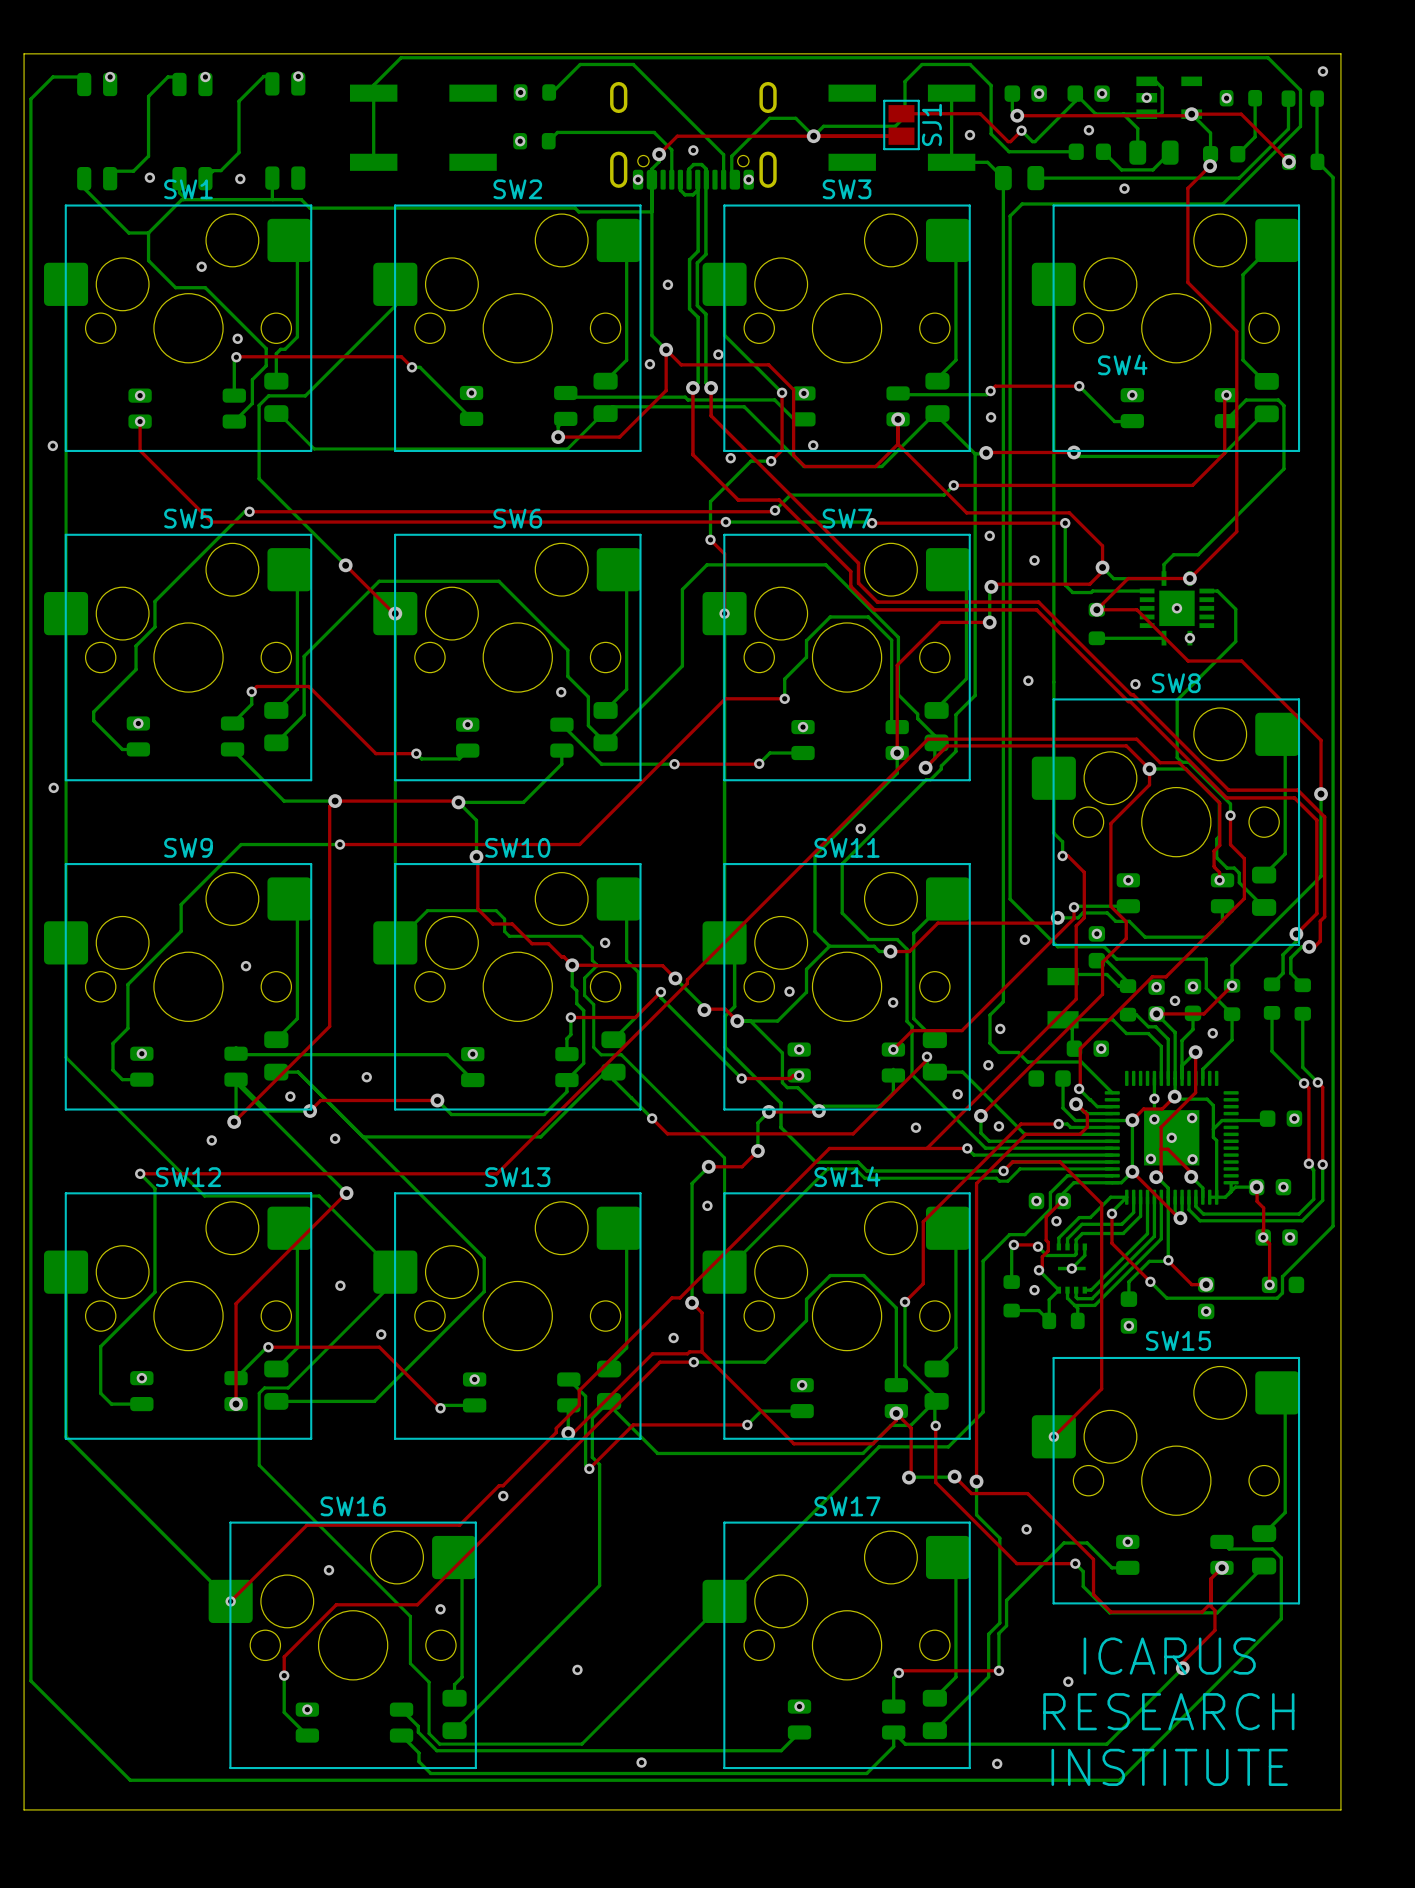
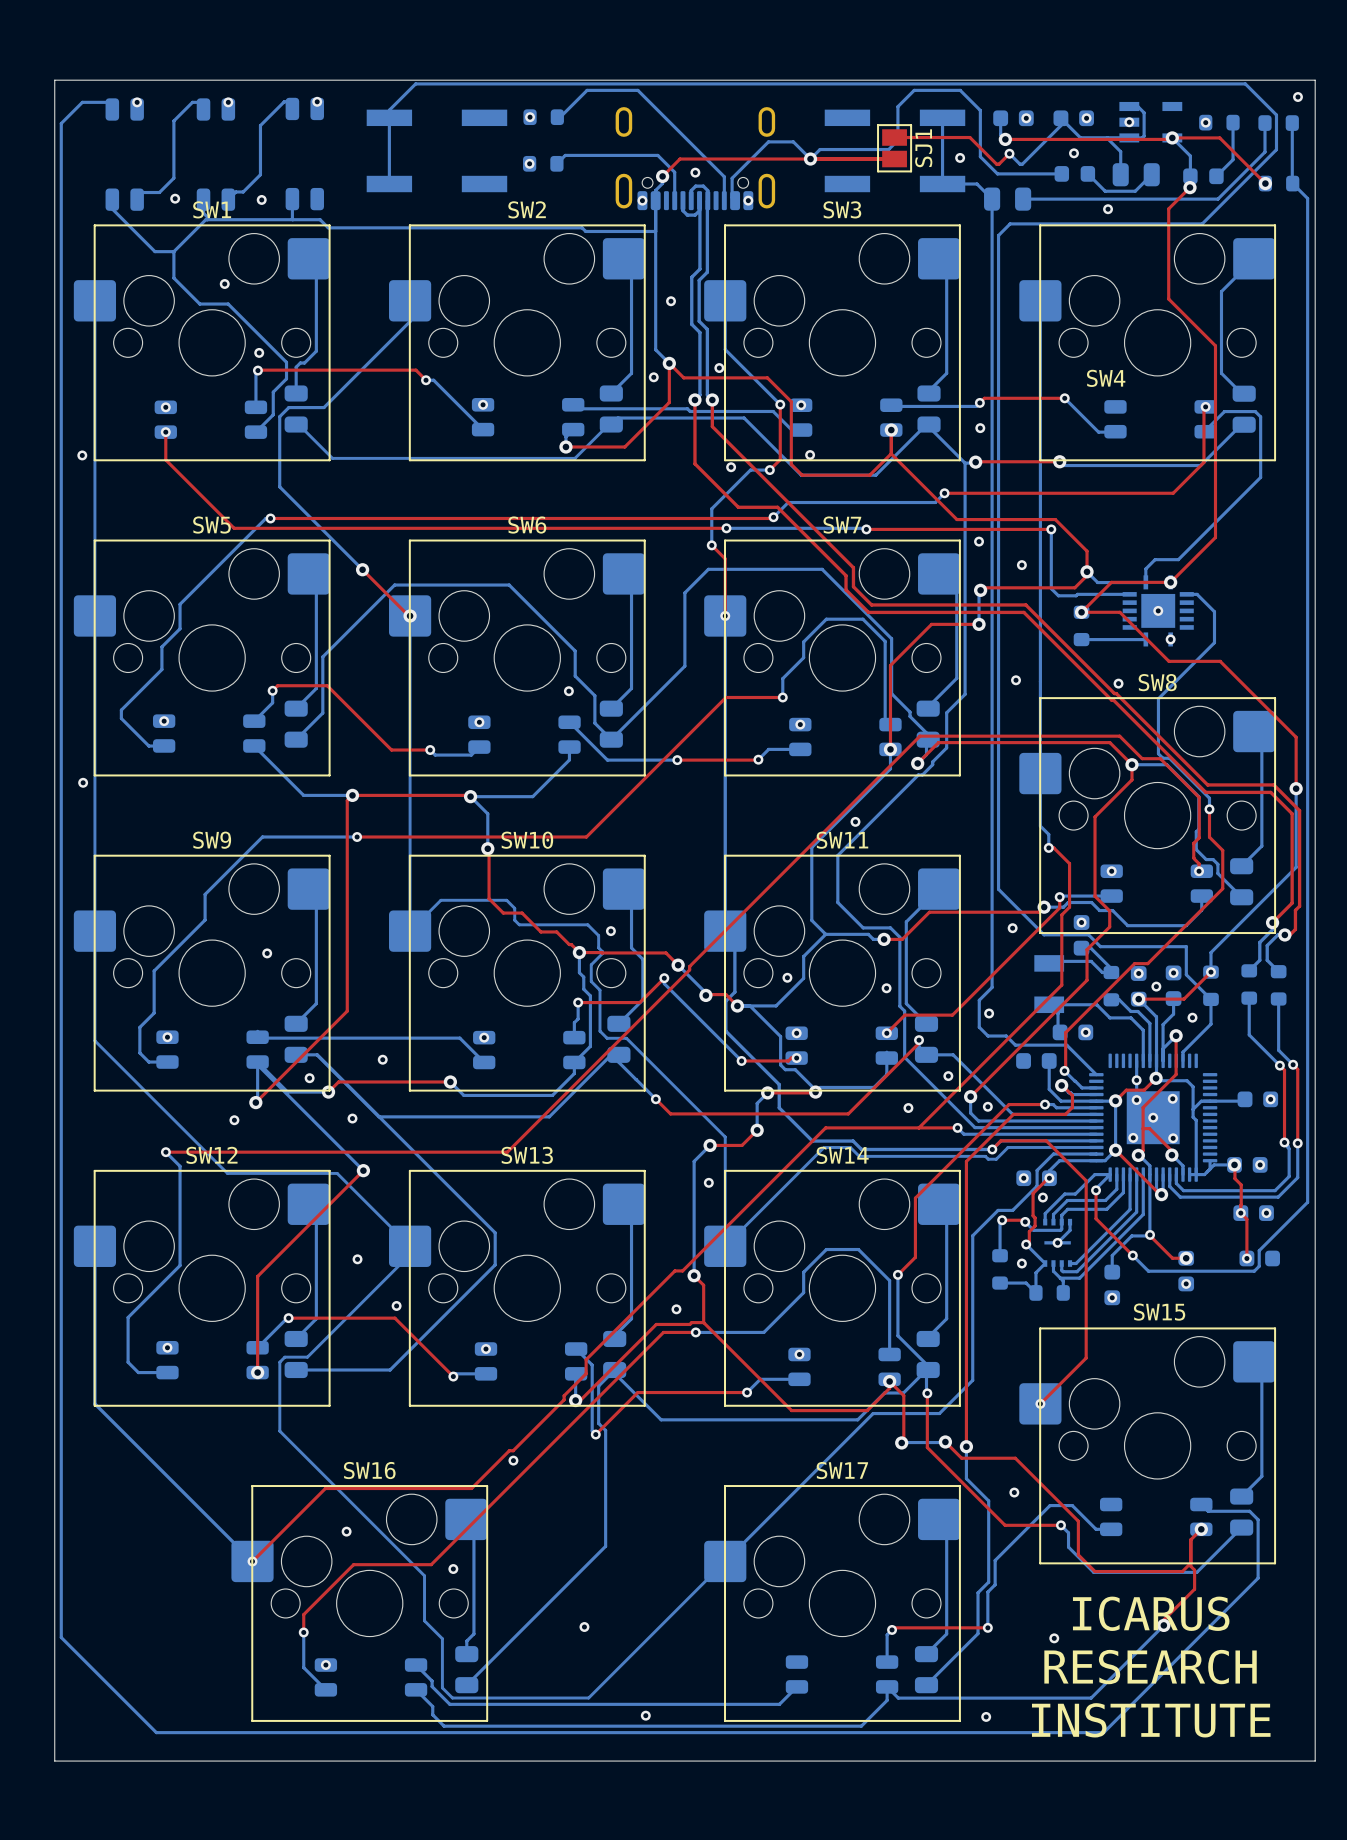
via: (1132, 395) -> none
via: (988, 1065) -> none
via: (1127, 1541) -> none
via: (799, 1706) -> none

